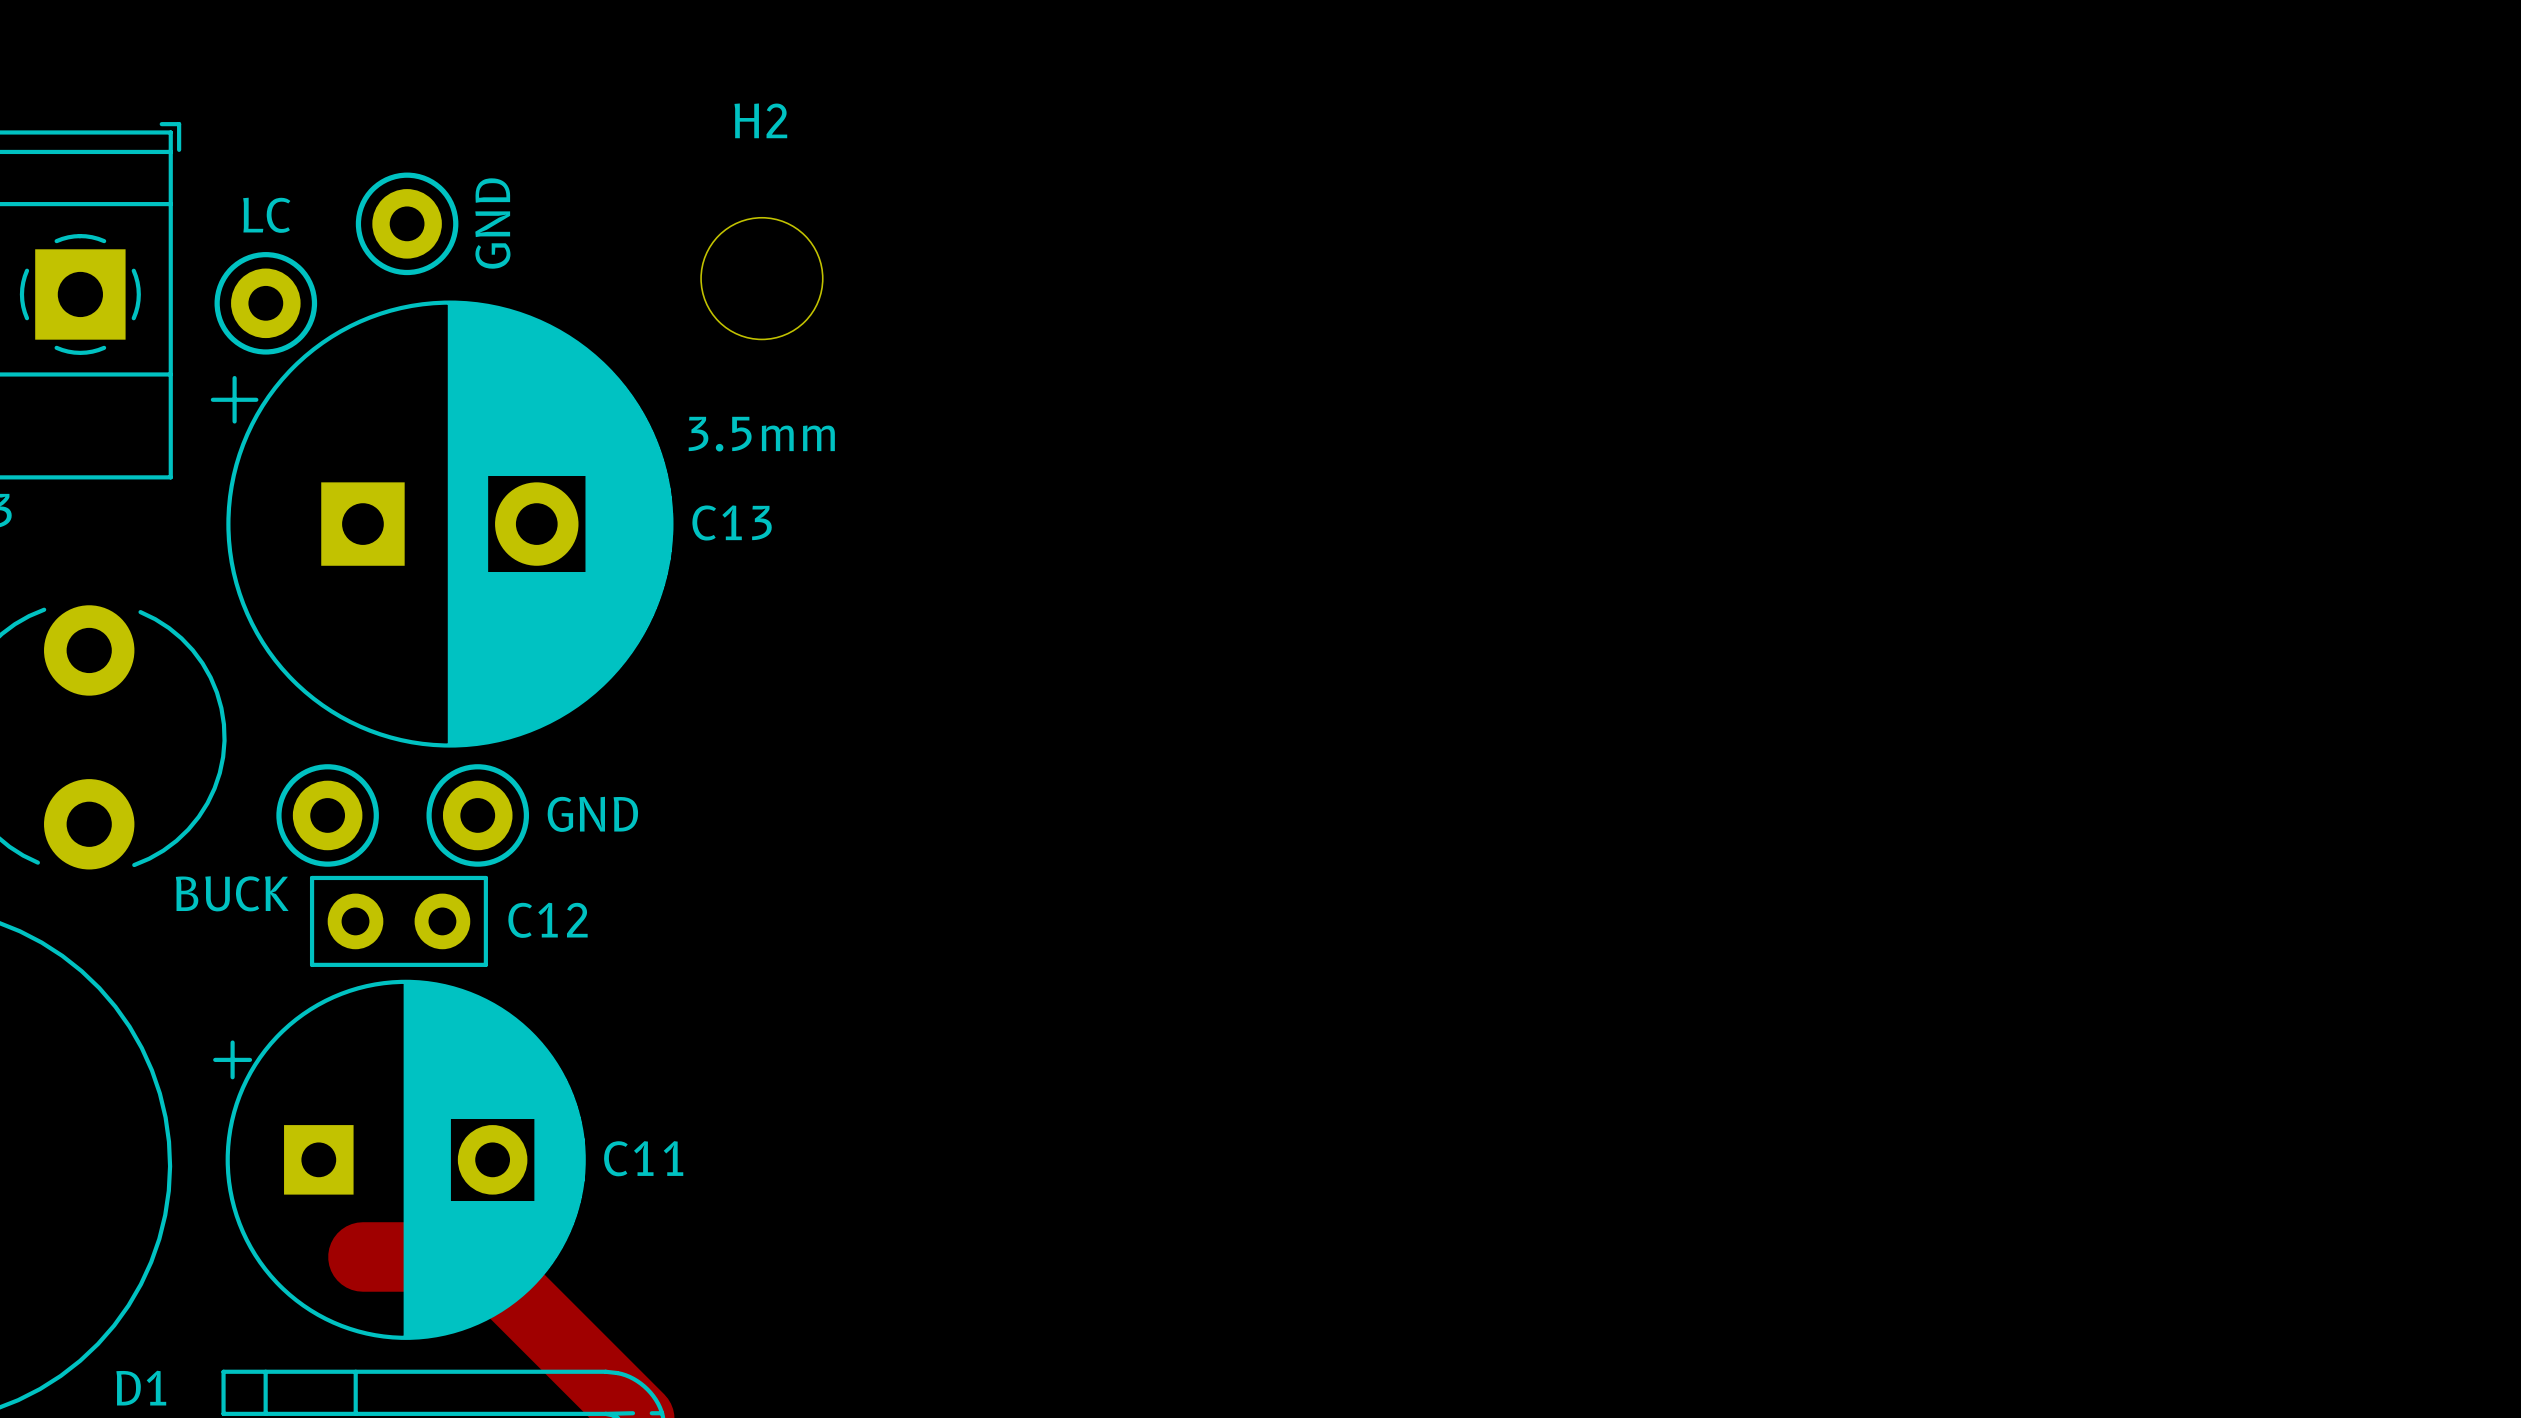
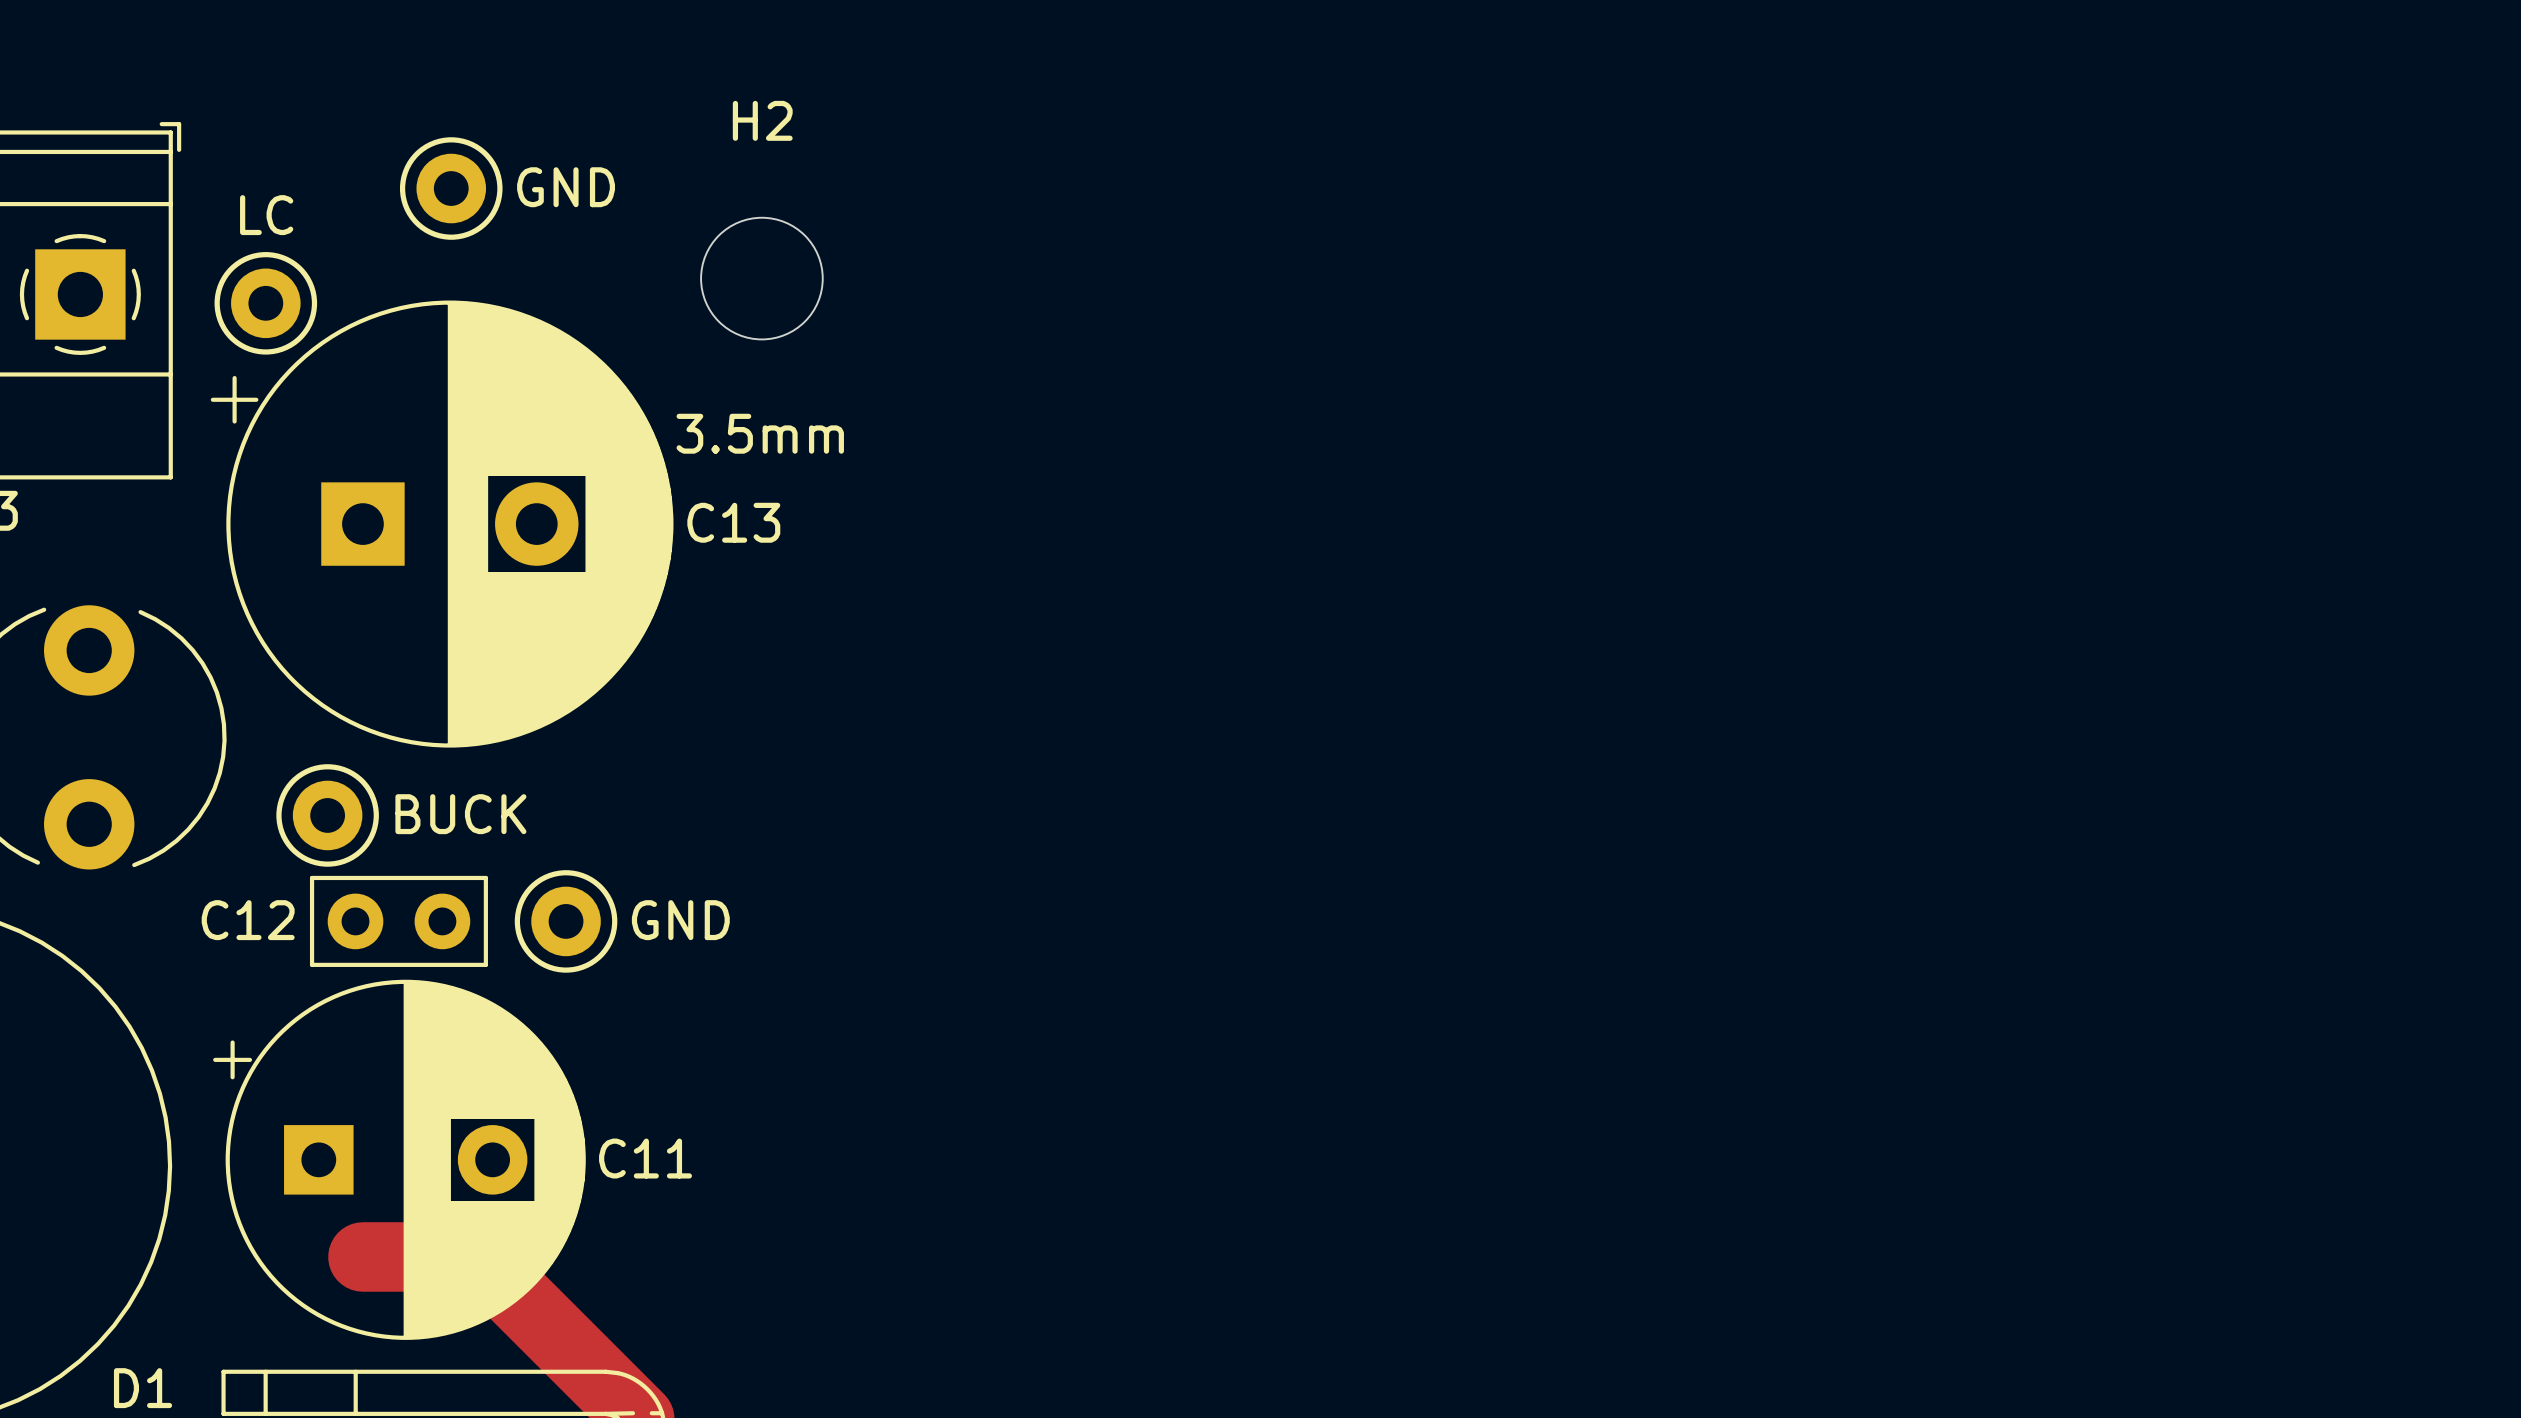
part position: (407, 223) -> (451, 188)
part value rotation: 0° (492, 223) -> 90° clockwise (566, 187)
part position: (477, 815) -> (566, 921)
part value position: BUCK (232, 893) -> BUCK (460, 814)
C12 name position: C12 (548, 920) -> C12 (248, 920)

